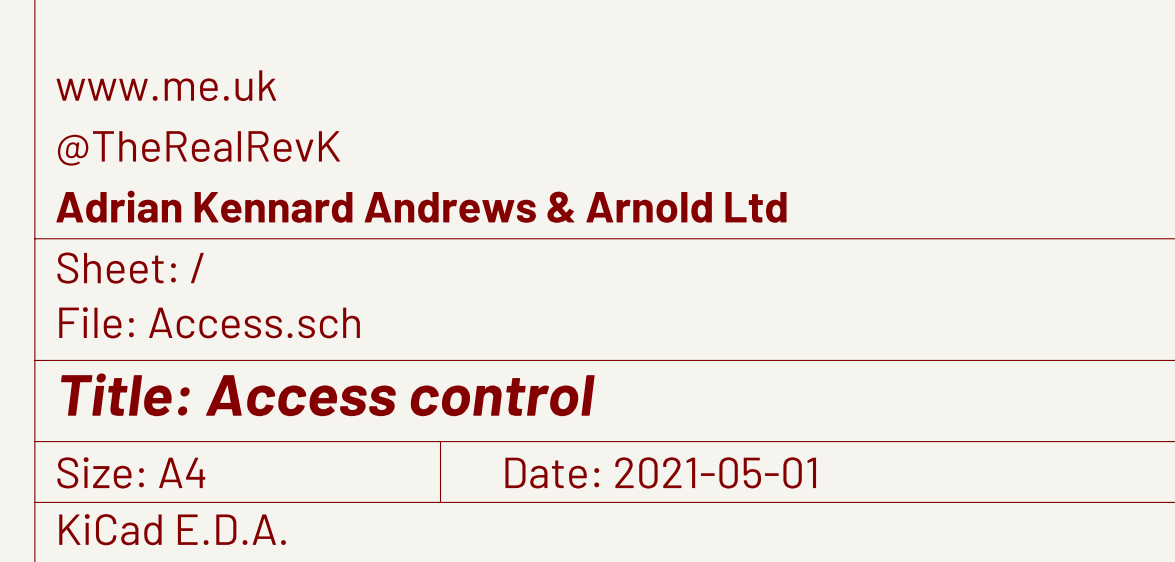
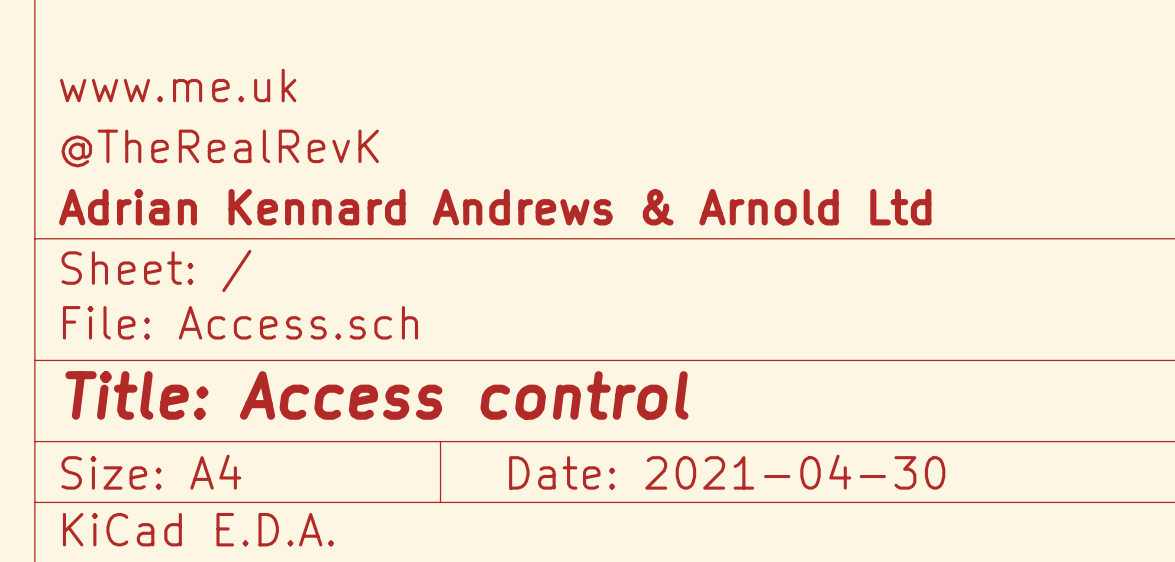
title block: Date: 2021-05-01 (660, 472) -> Date: 2021-04-30 (727, 472)

